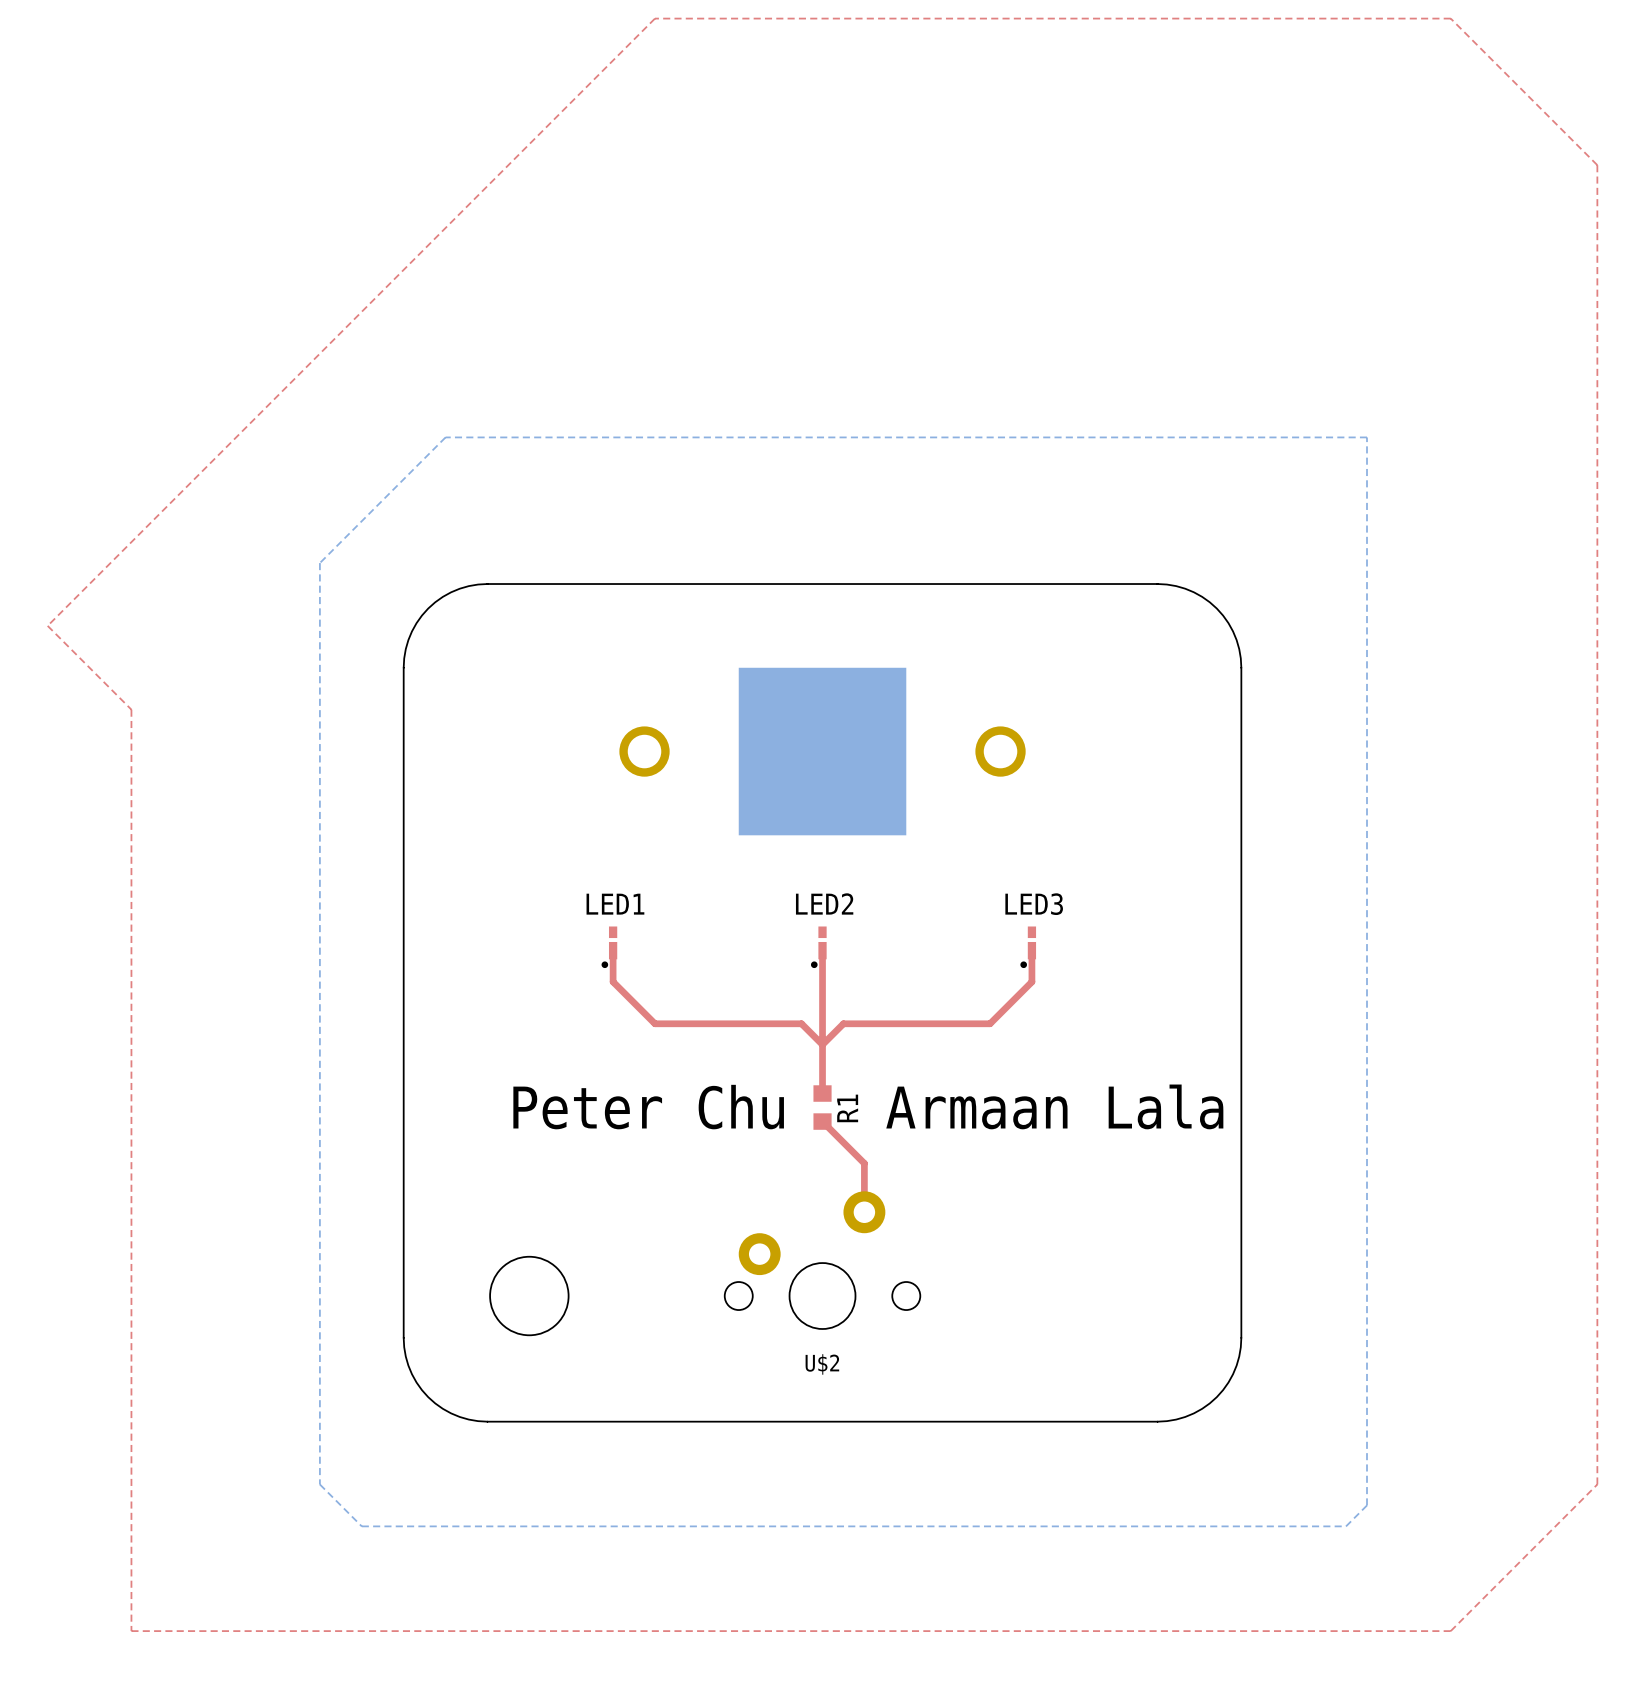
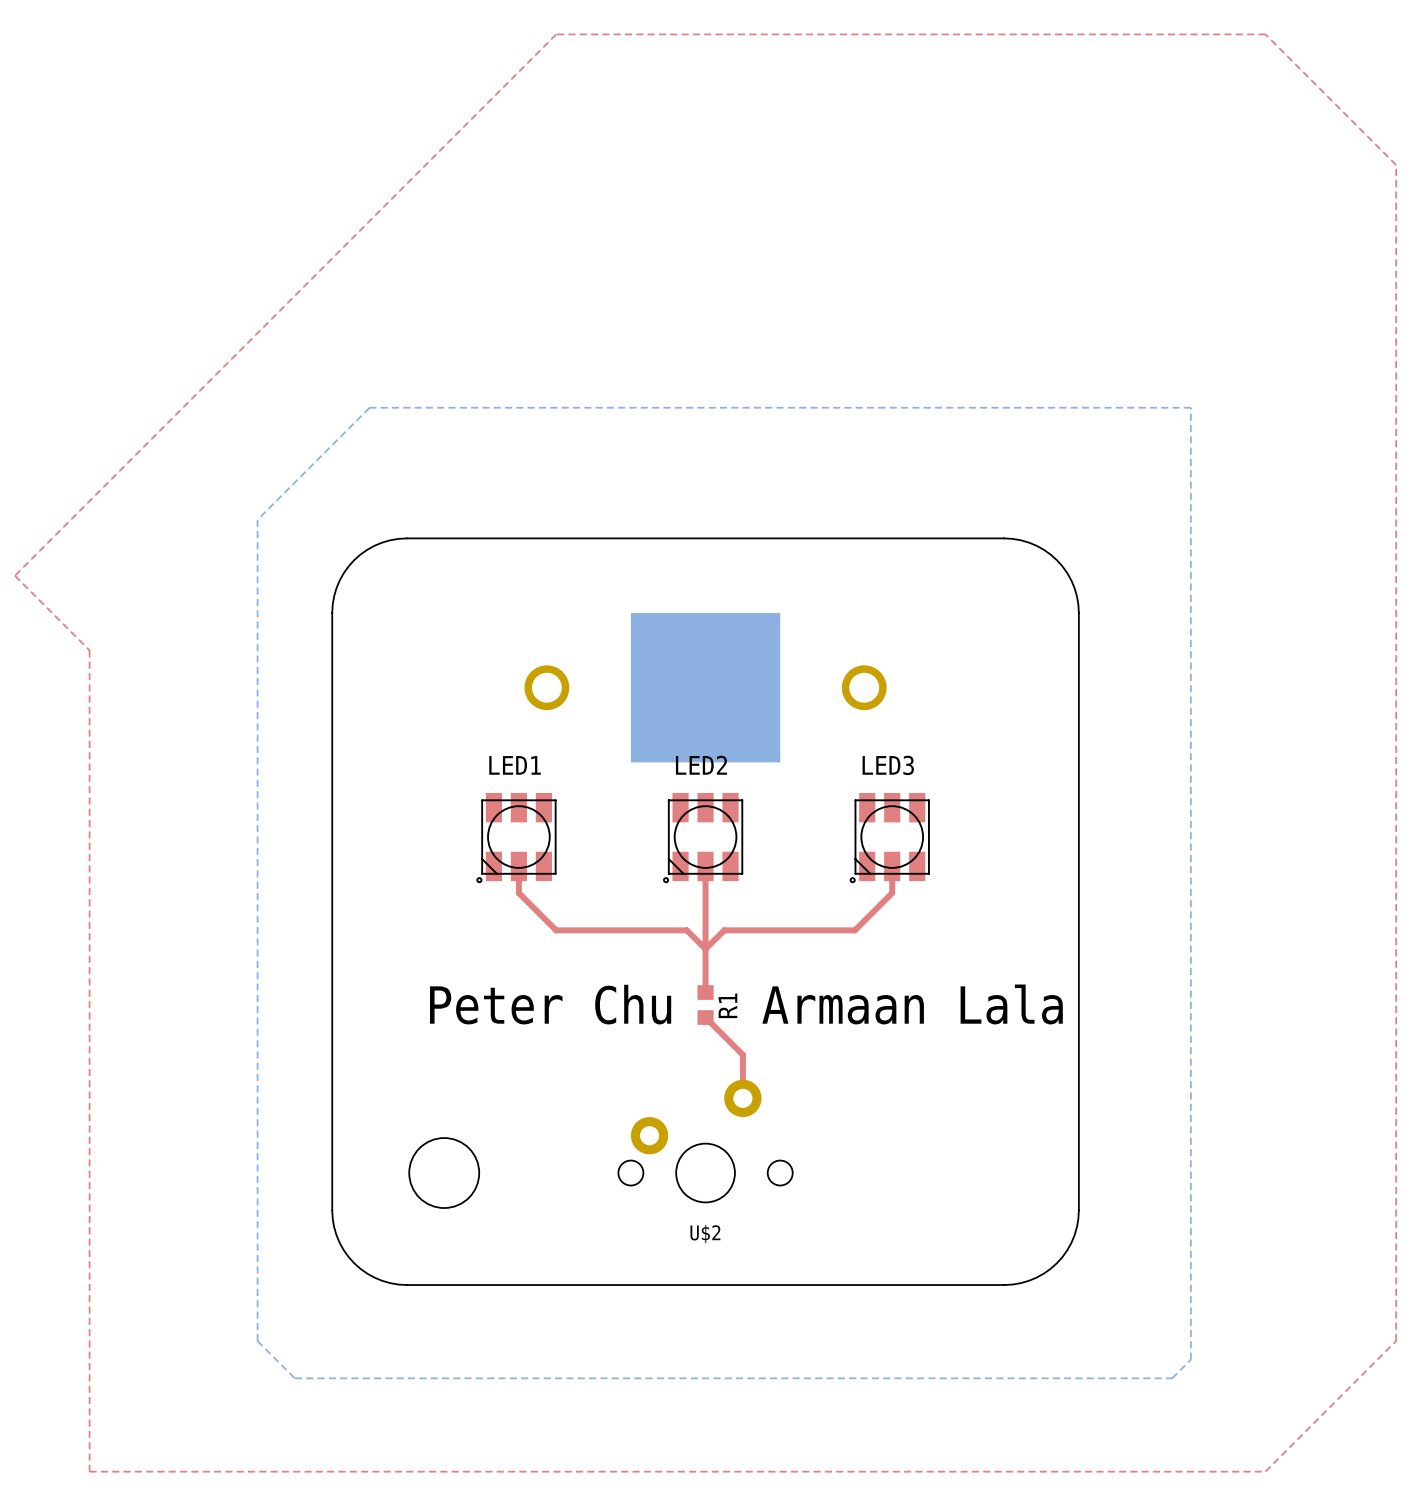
LED2 name position: LED2 (824, 903) -> LED2 (701, 765)
LED1 name position: LED1 (615, 904) -> LED1 (515, 765)
LED3 name position: LED3 (1034, 904) -> LED3 (888, 765)
LED1 footprint: [601, 926, 618, 969] -> [476, 792, 557, 884]
LED2 footprint: [810, 926, 827, 969] -> [663, 792, 744, 884]
LED3 footprint: [1020, 926, 1037, 969] -> [849, 792, 930, 884]

